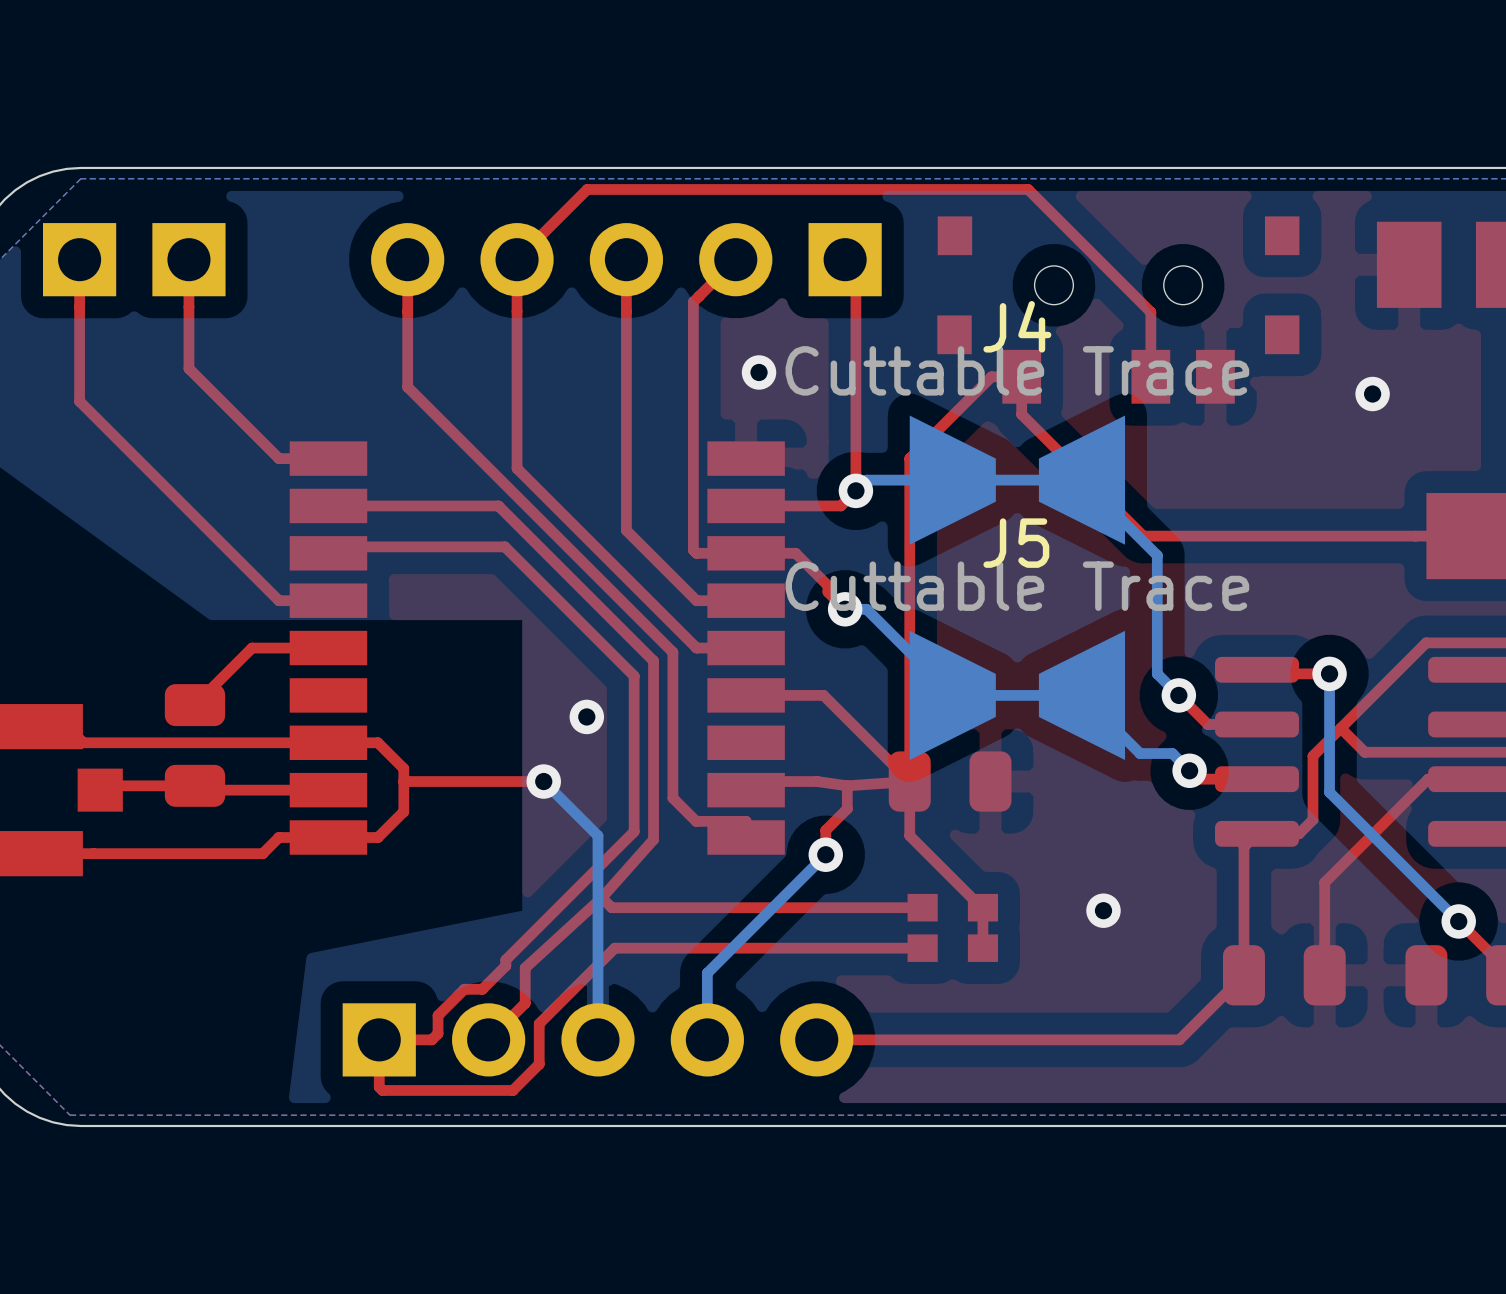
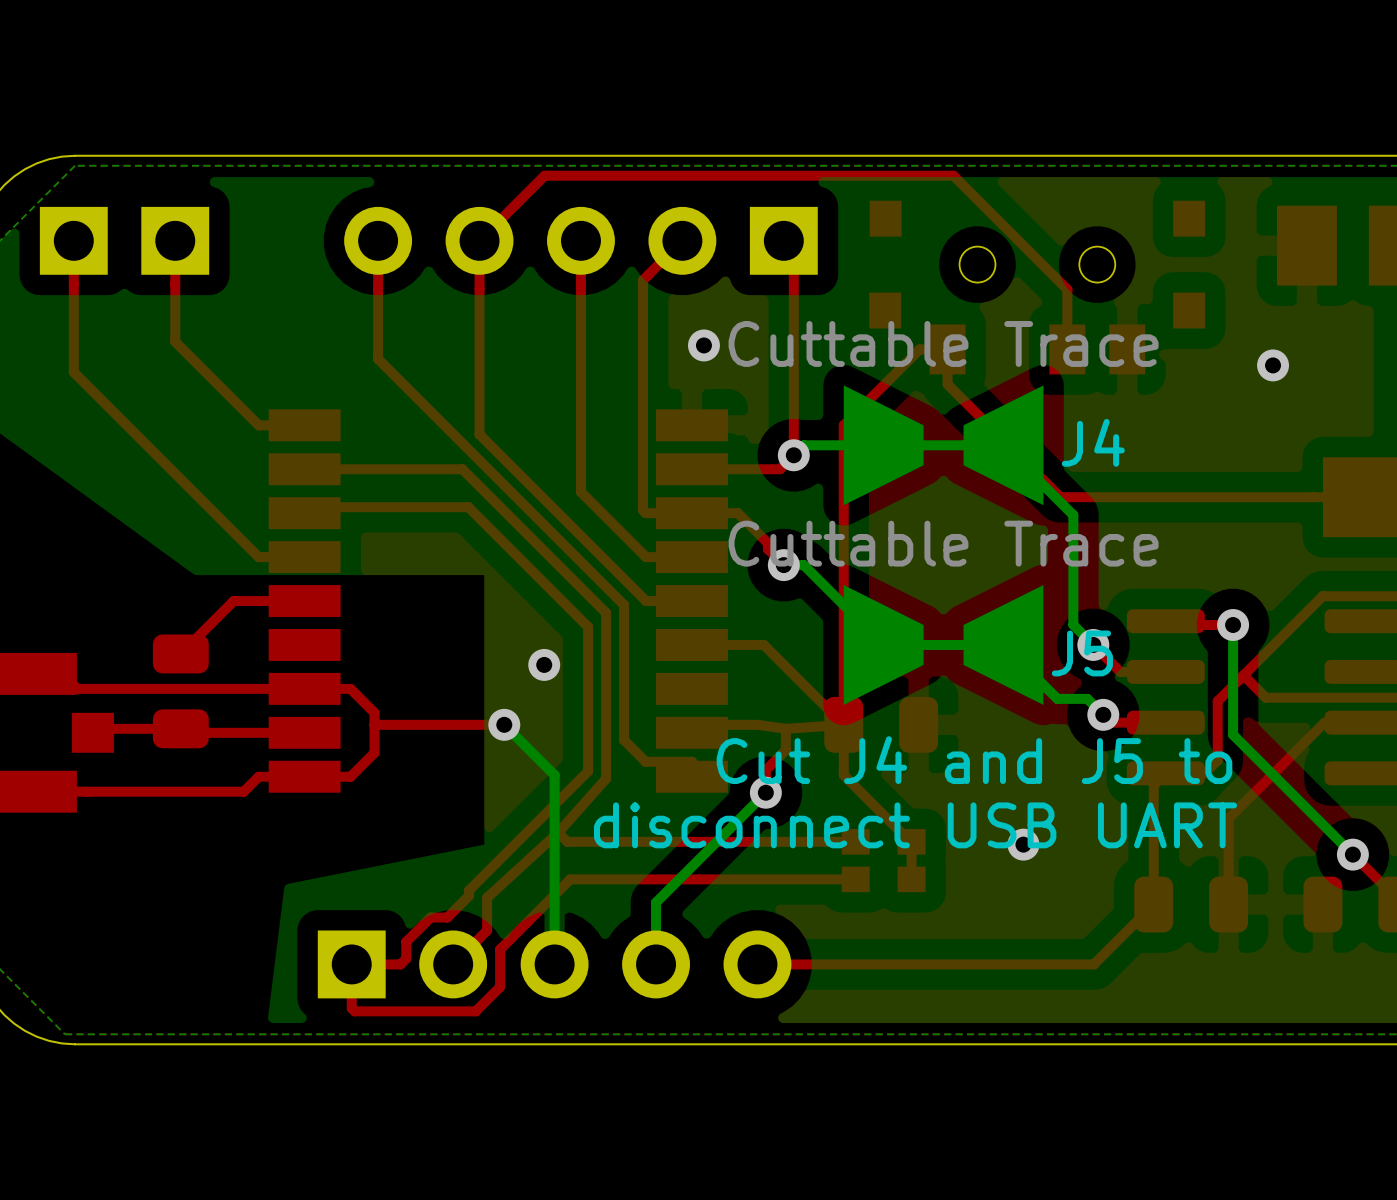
J4 name position: J4 (1017, 326) -> J4 (1093, 442)
J5 name position: J5 (1016, 543) -> J5 (1082, 653)
text: none -> Cut J4 and J5 to (974, 760)
text: none -> disconnect USB UART (915, 825)

